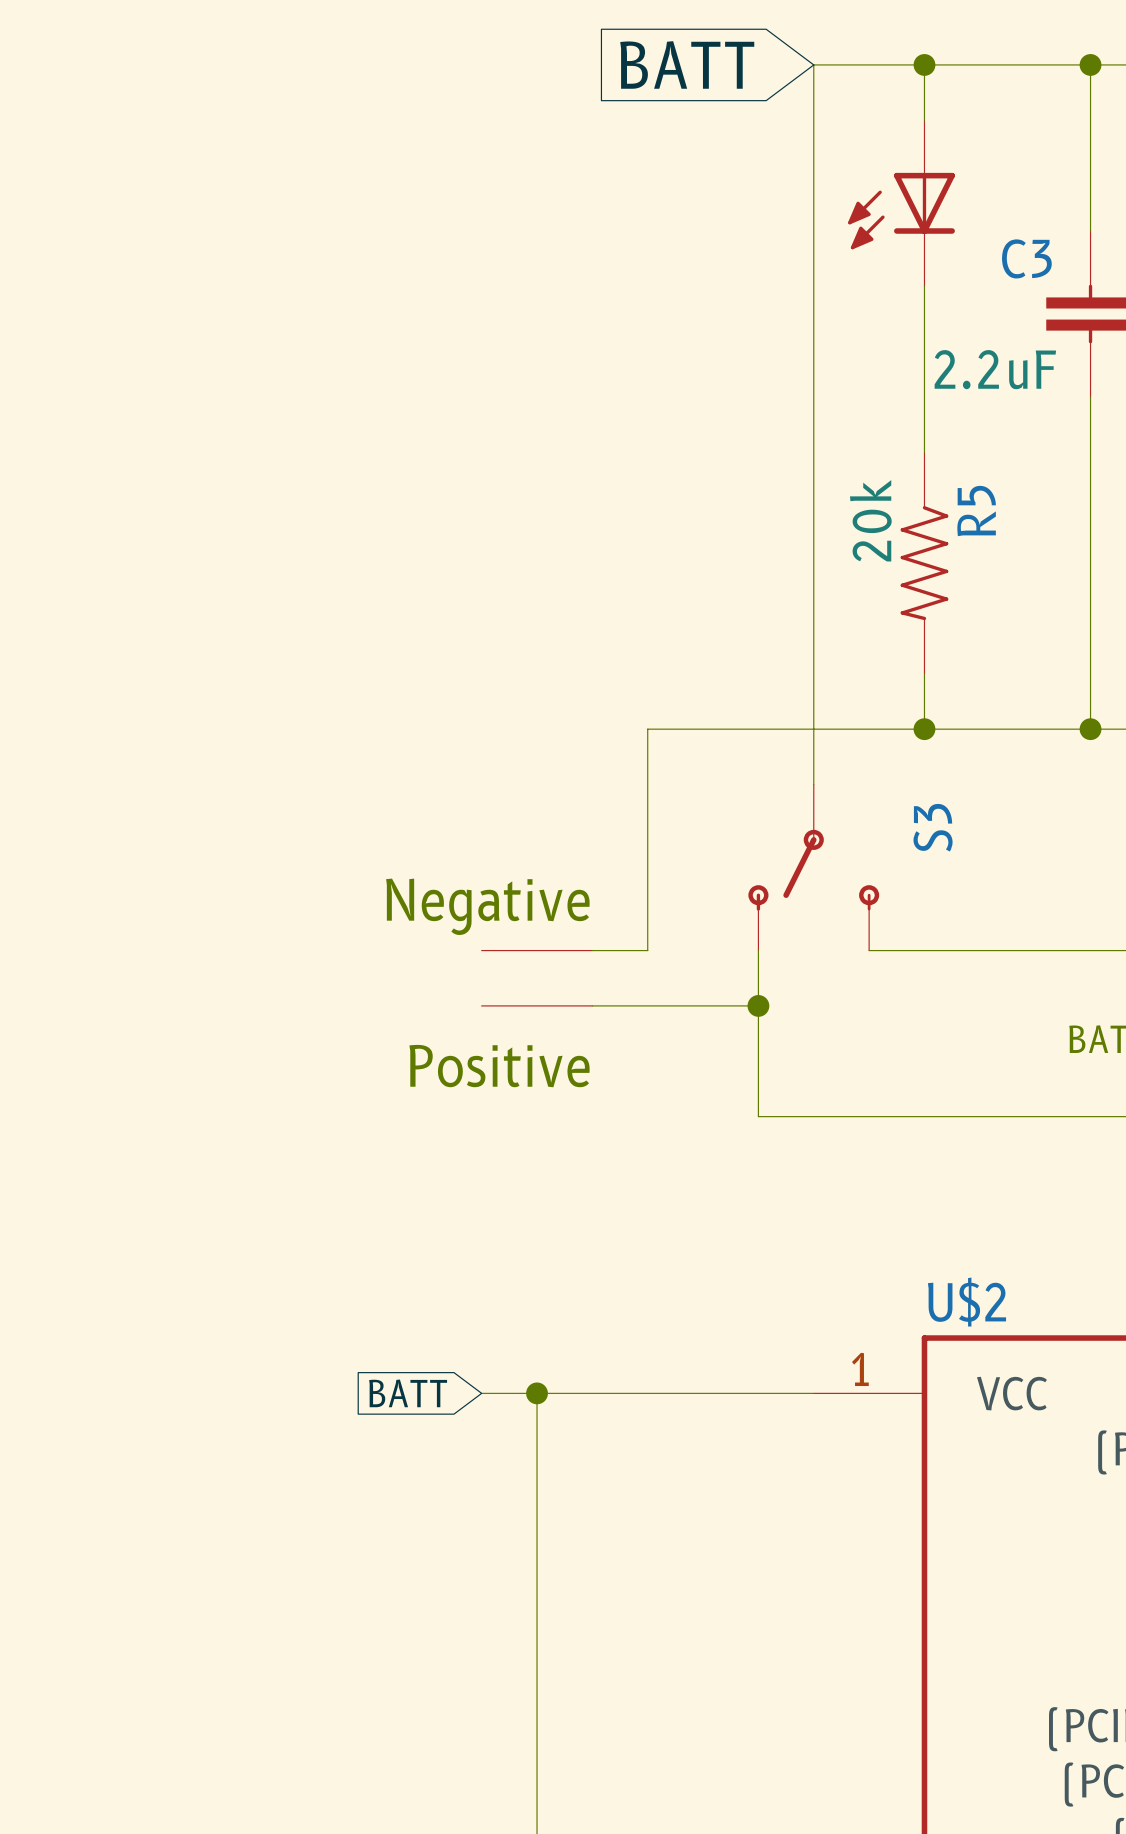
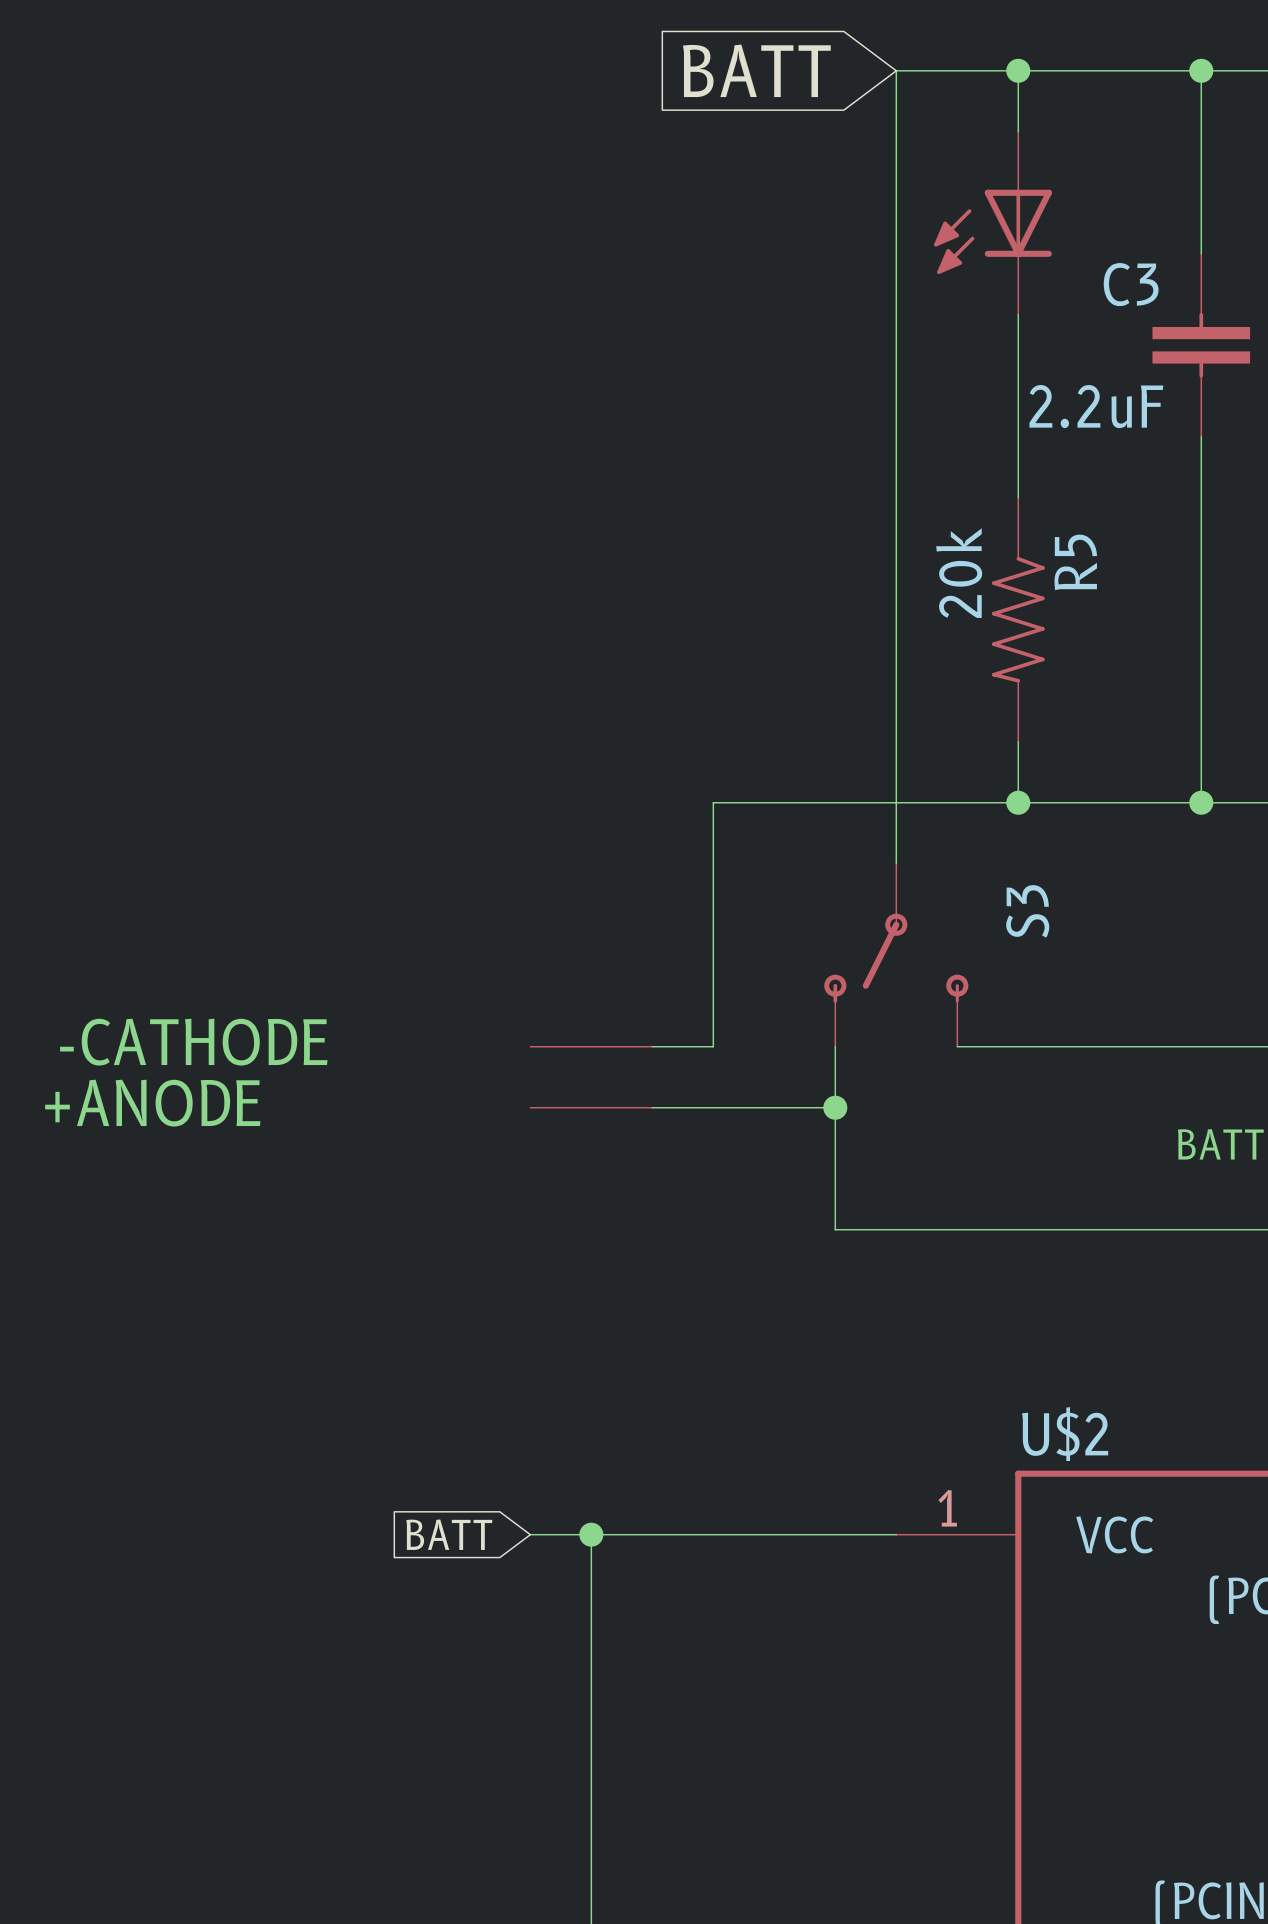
text: Negative (487, 906) -> none
text: none -> -CATHODE (193, 1042)
text: none -> +ANODE (152, 1103)
text: Positive (499, 1066) -> none

